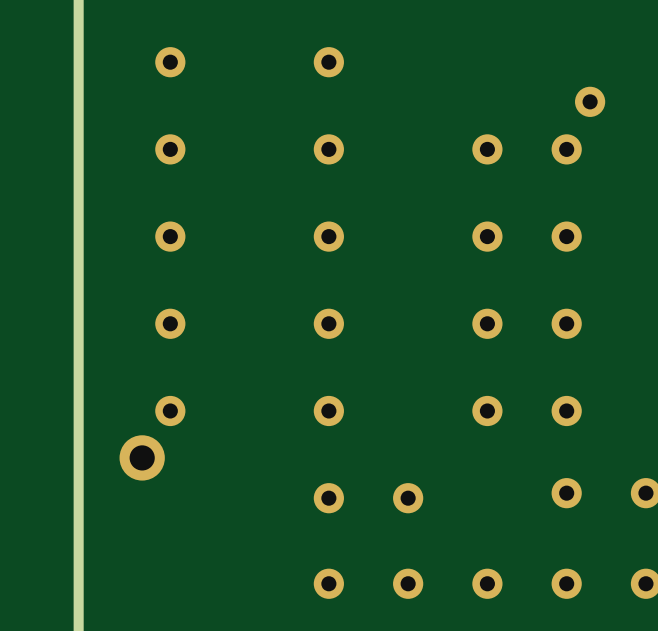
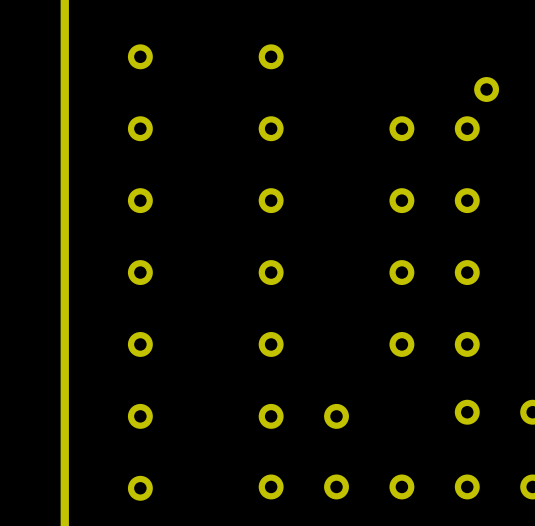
part: (142, 457) -> none
part: none -> (140, 416)
part: none -> (140, 488)

